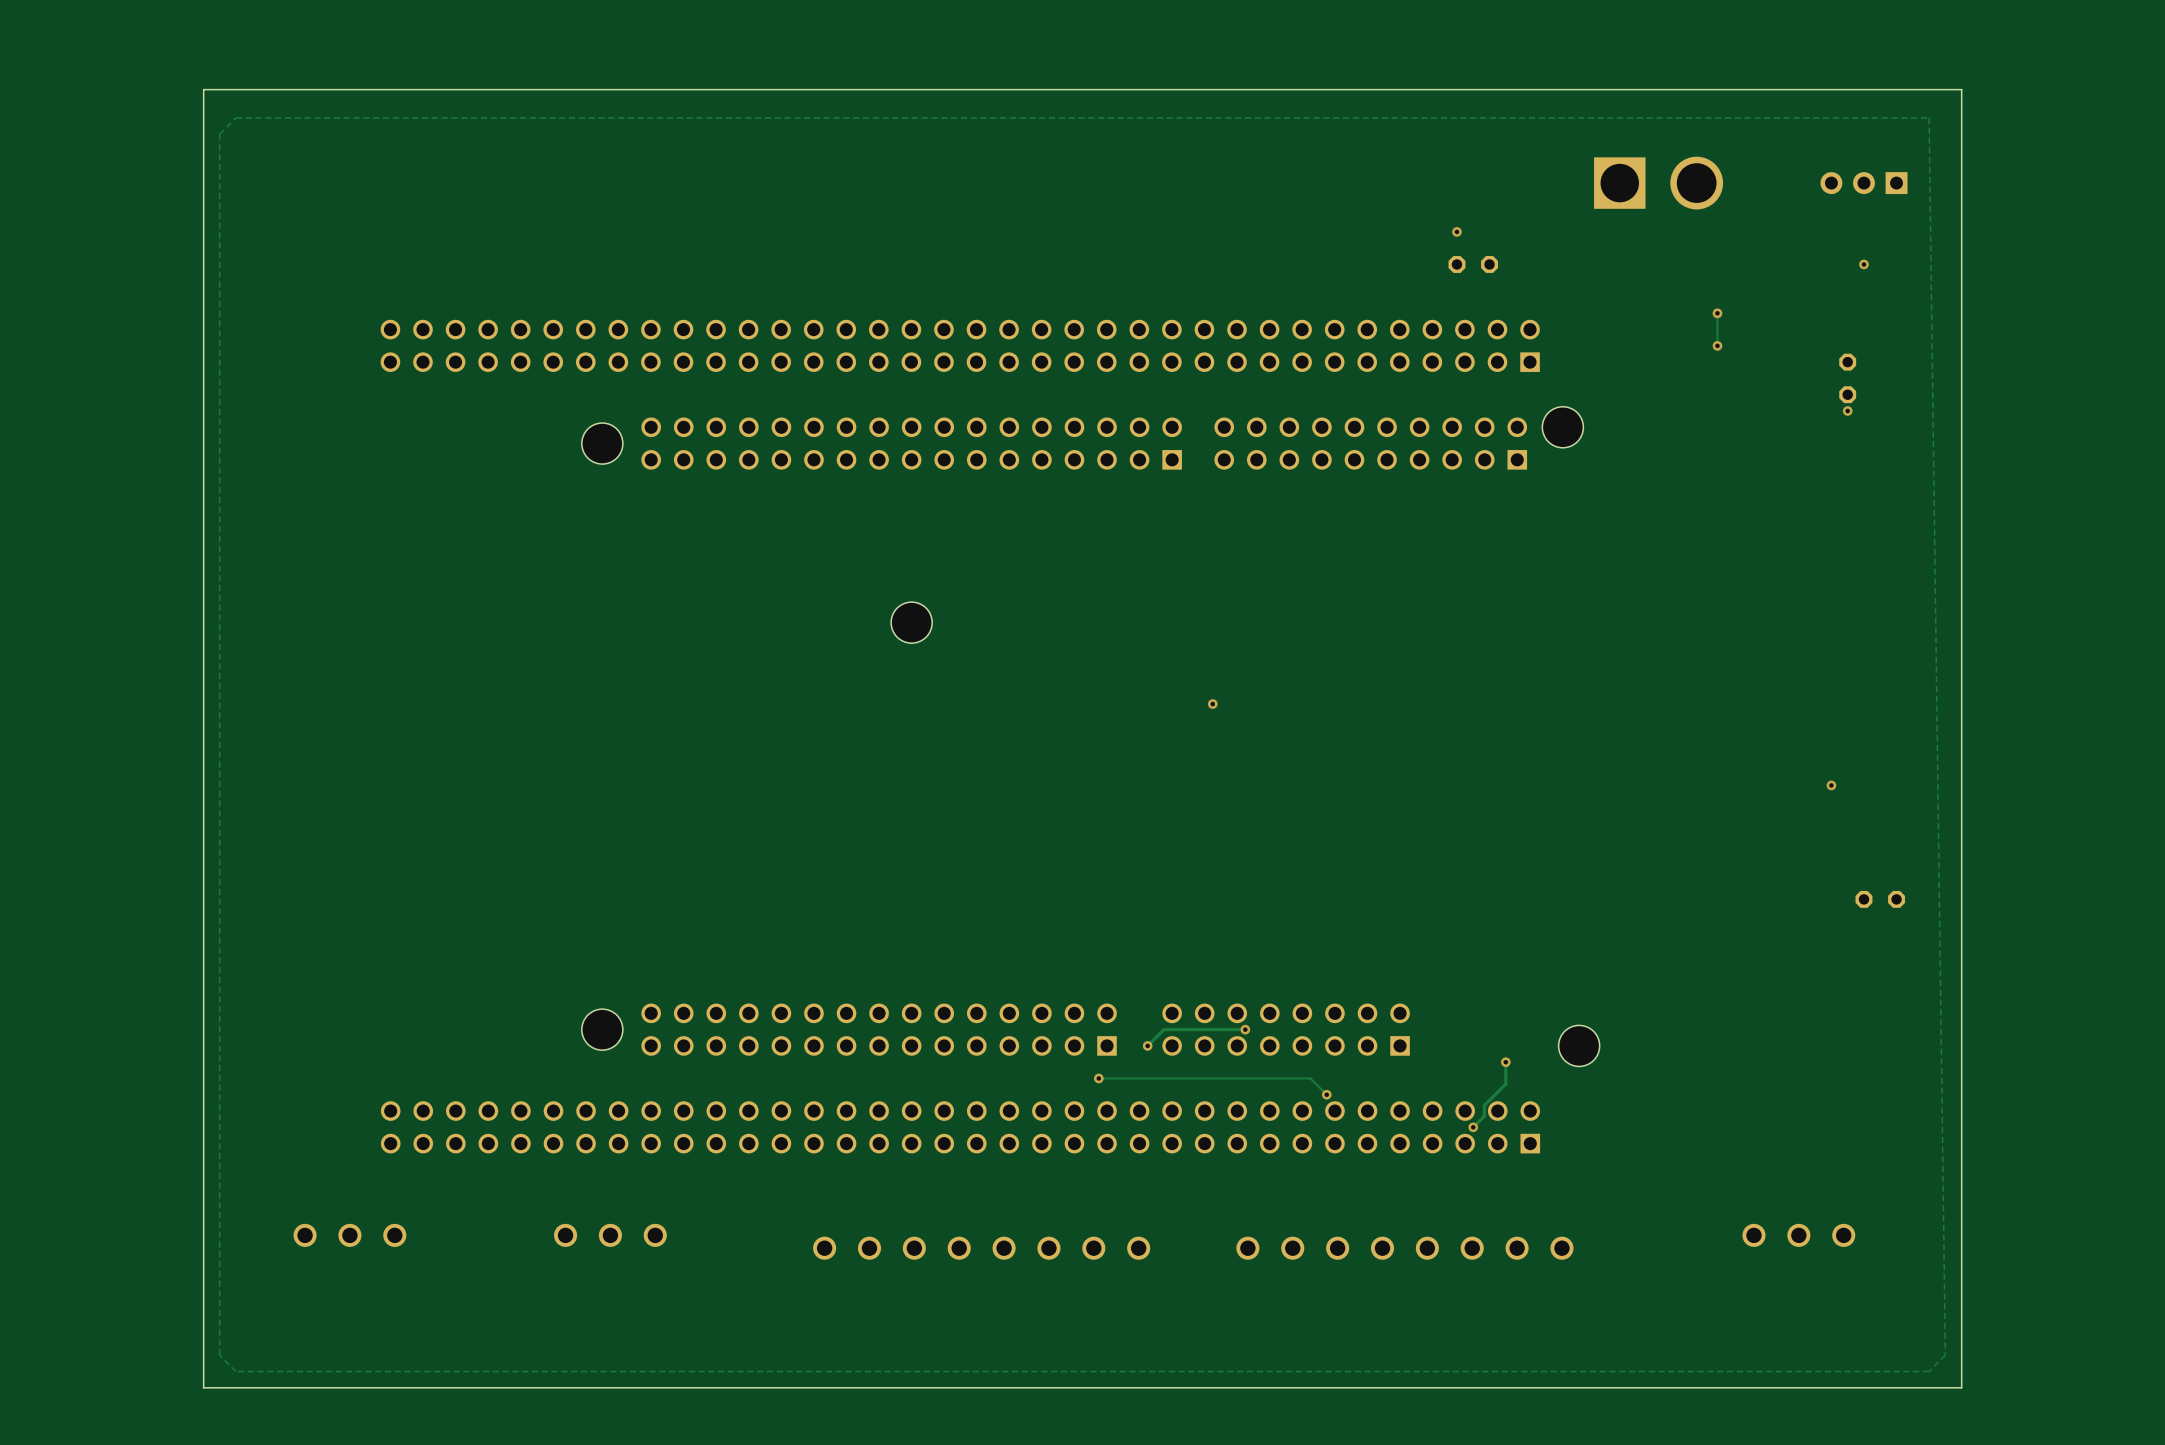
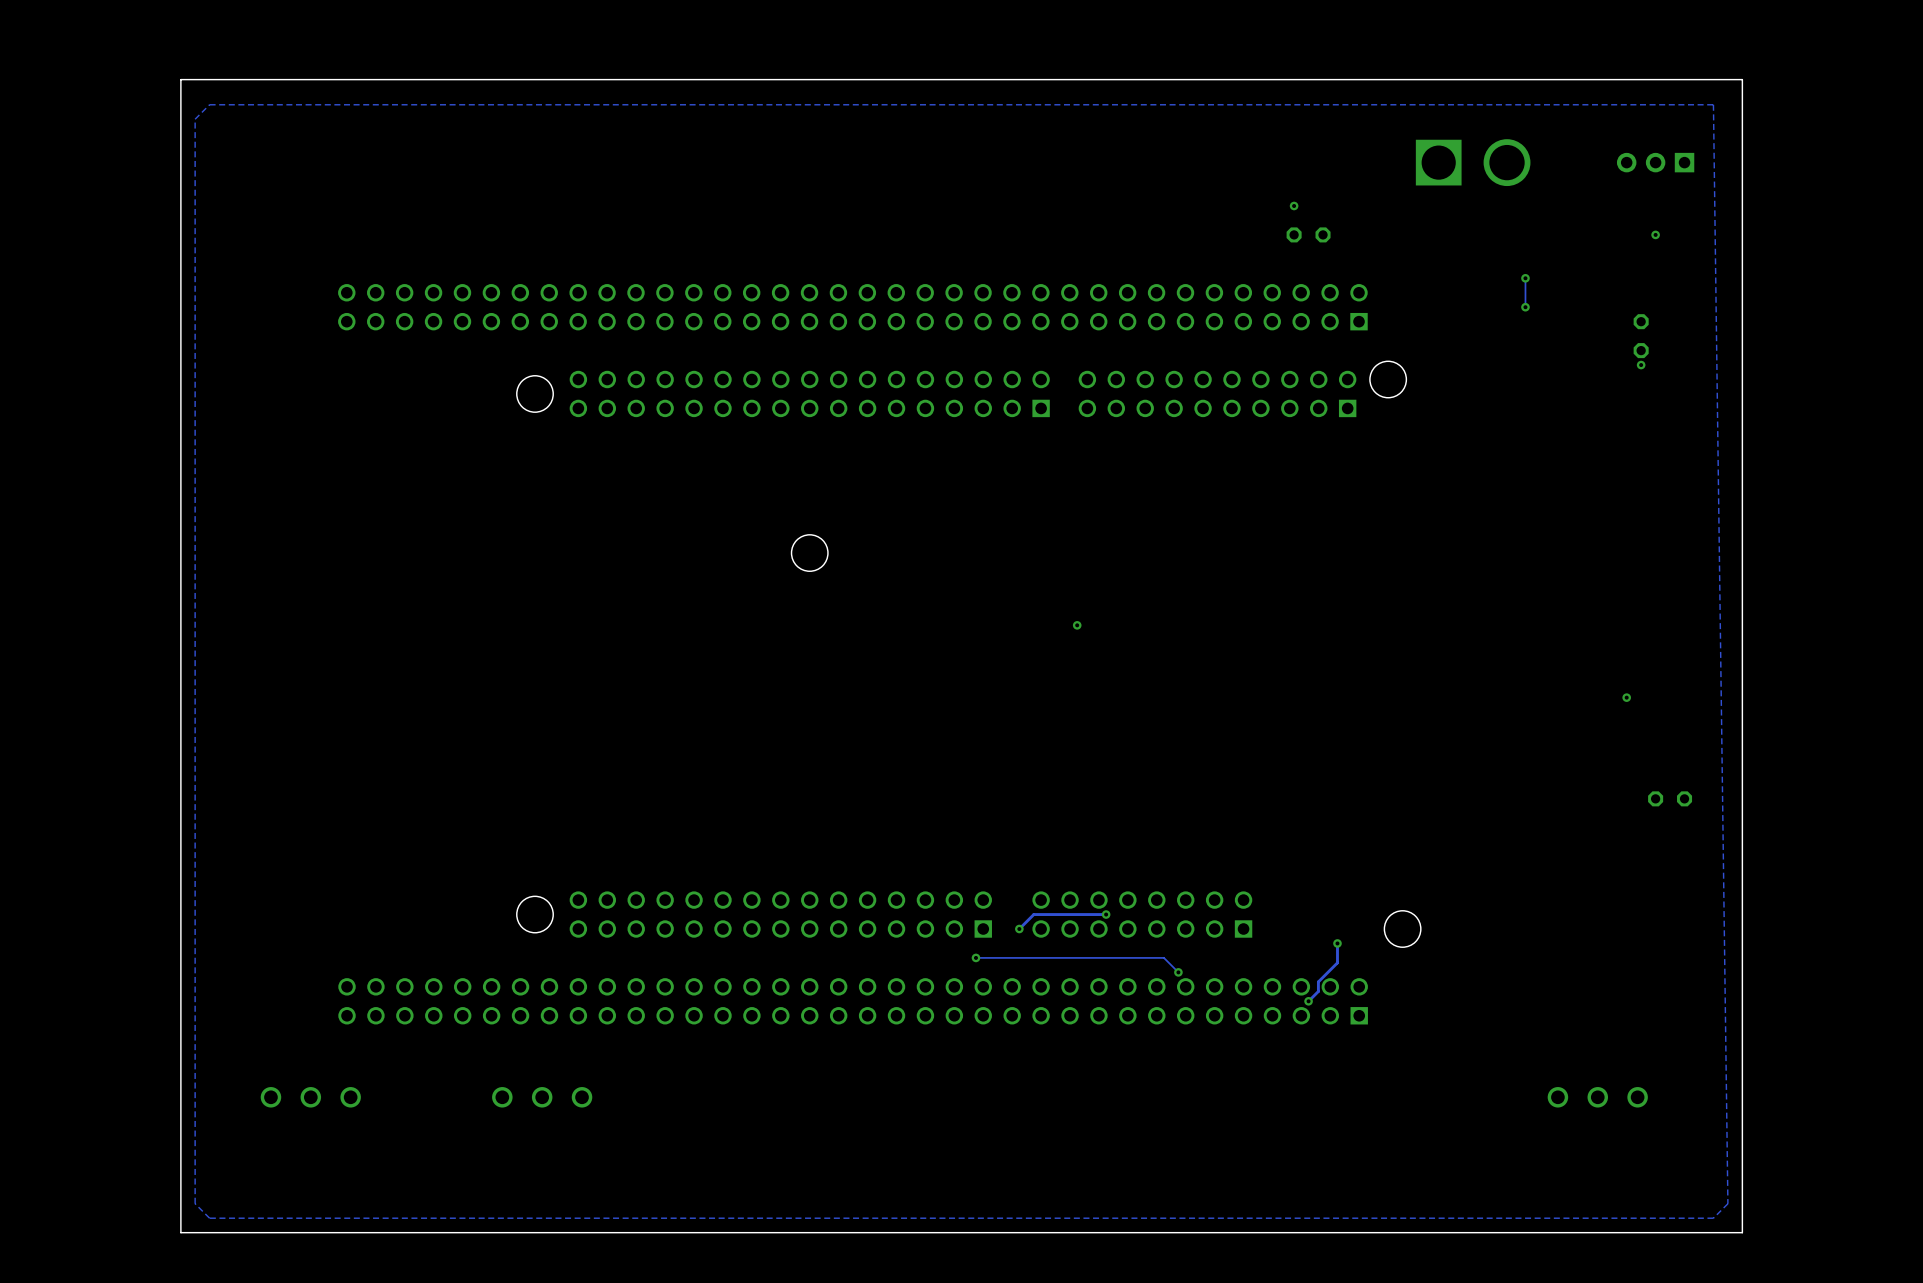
part: (981, 1248) -> none
part: (1404, 1248) -> none

